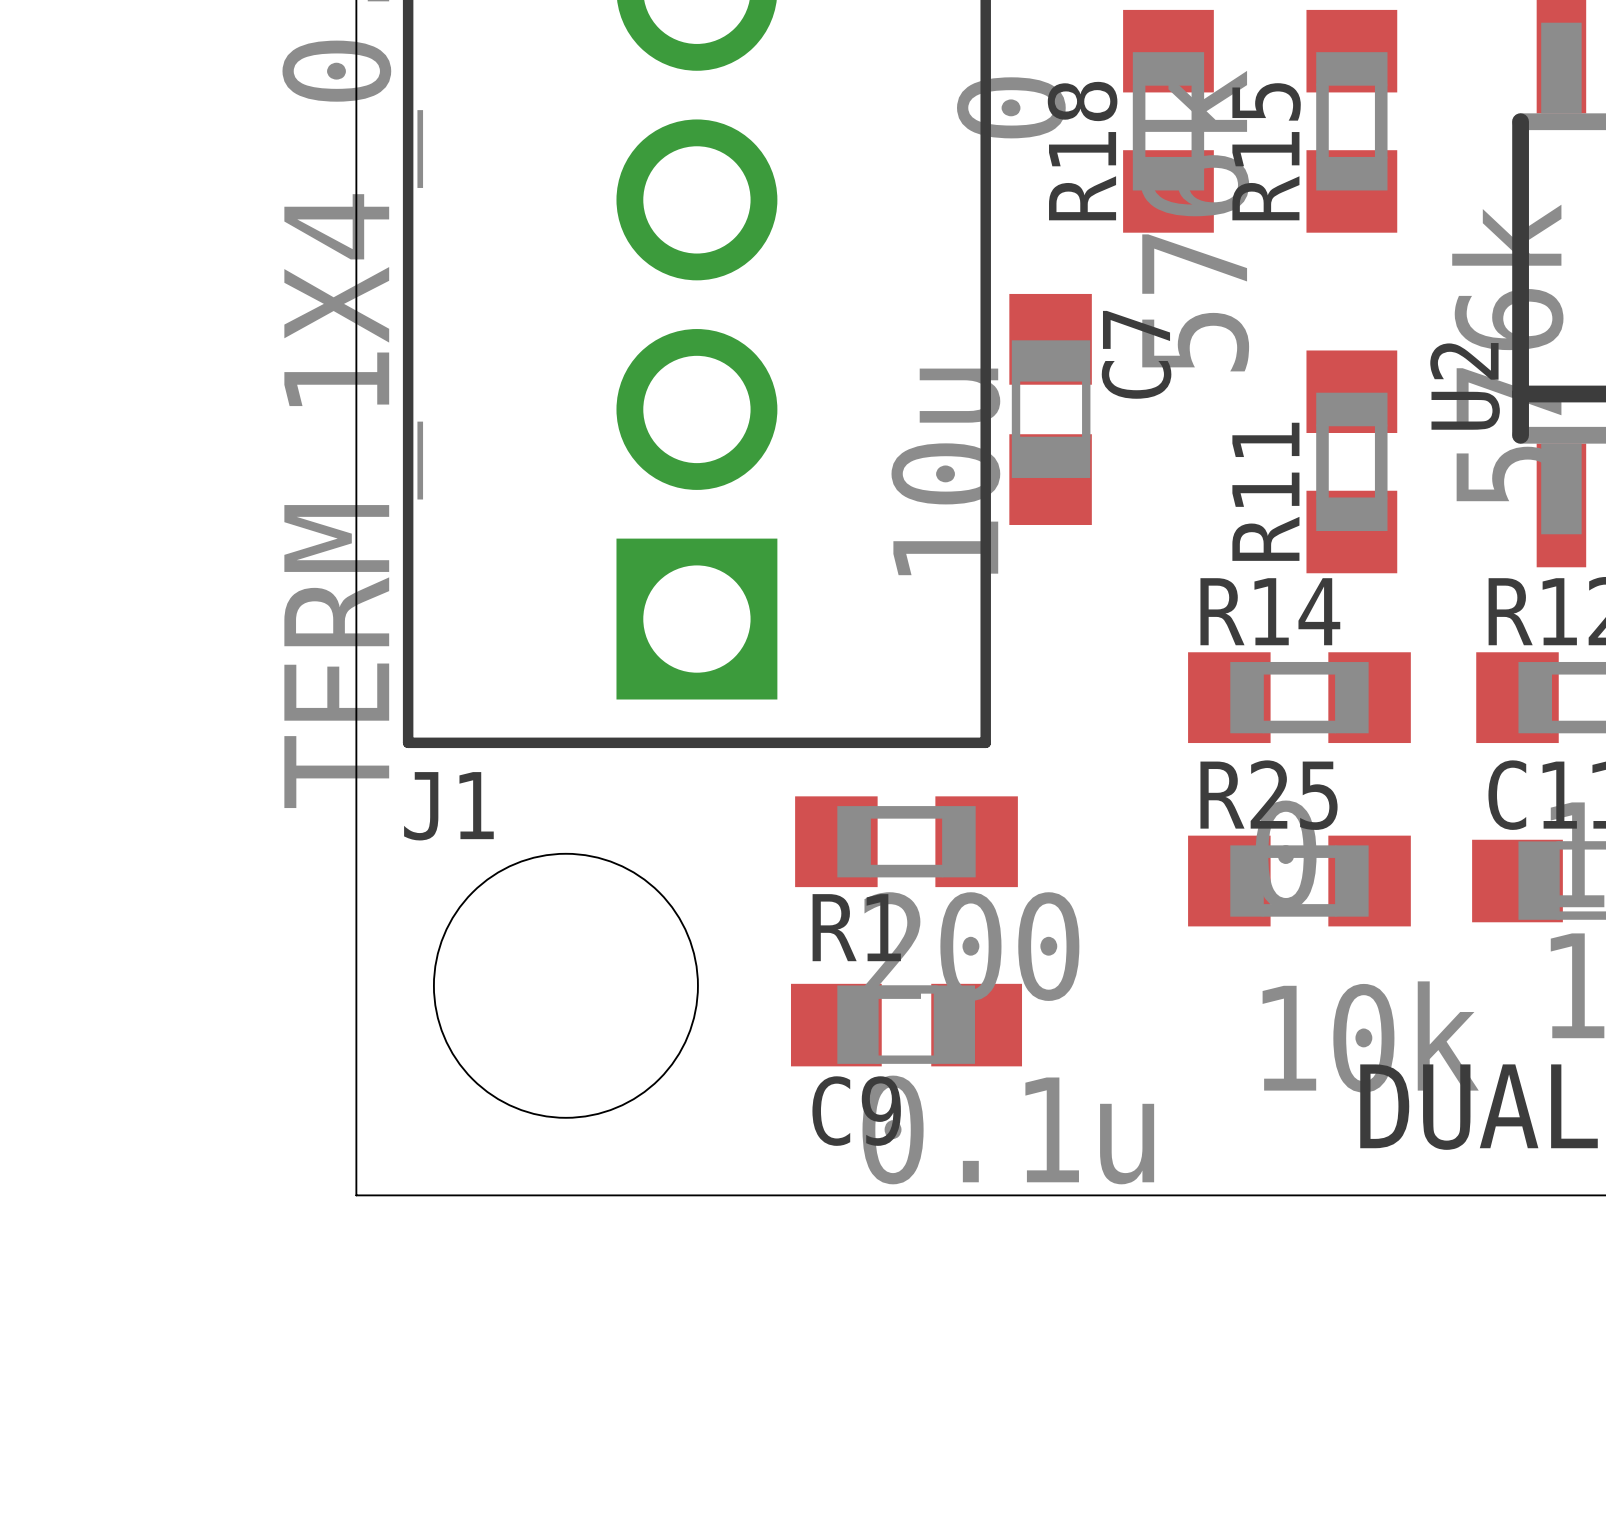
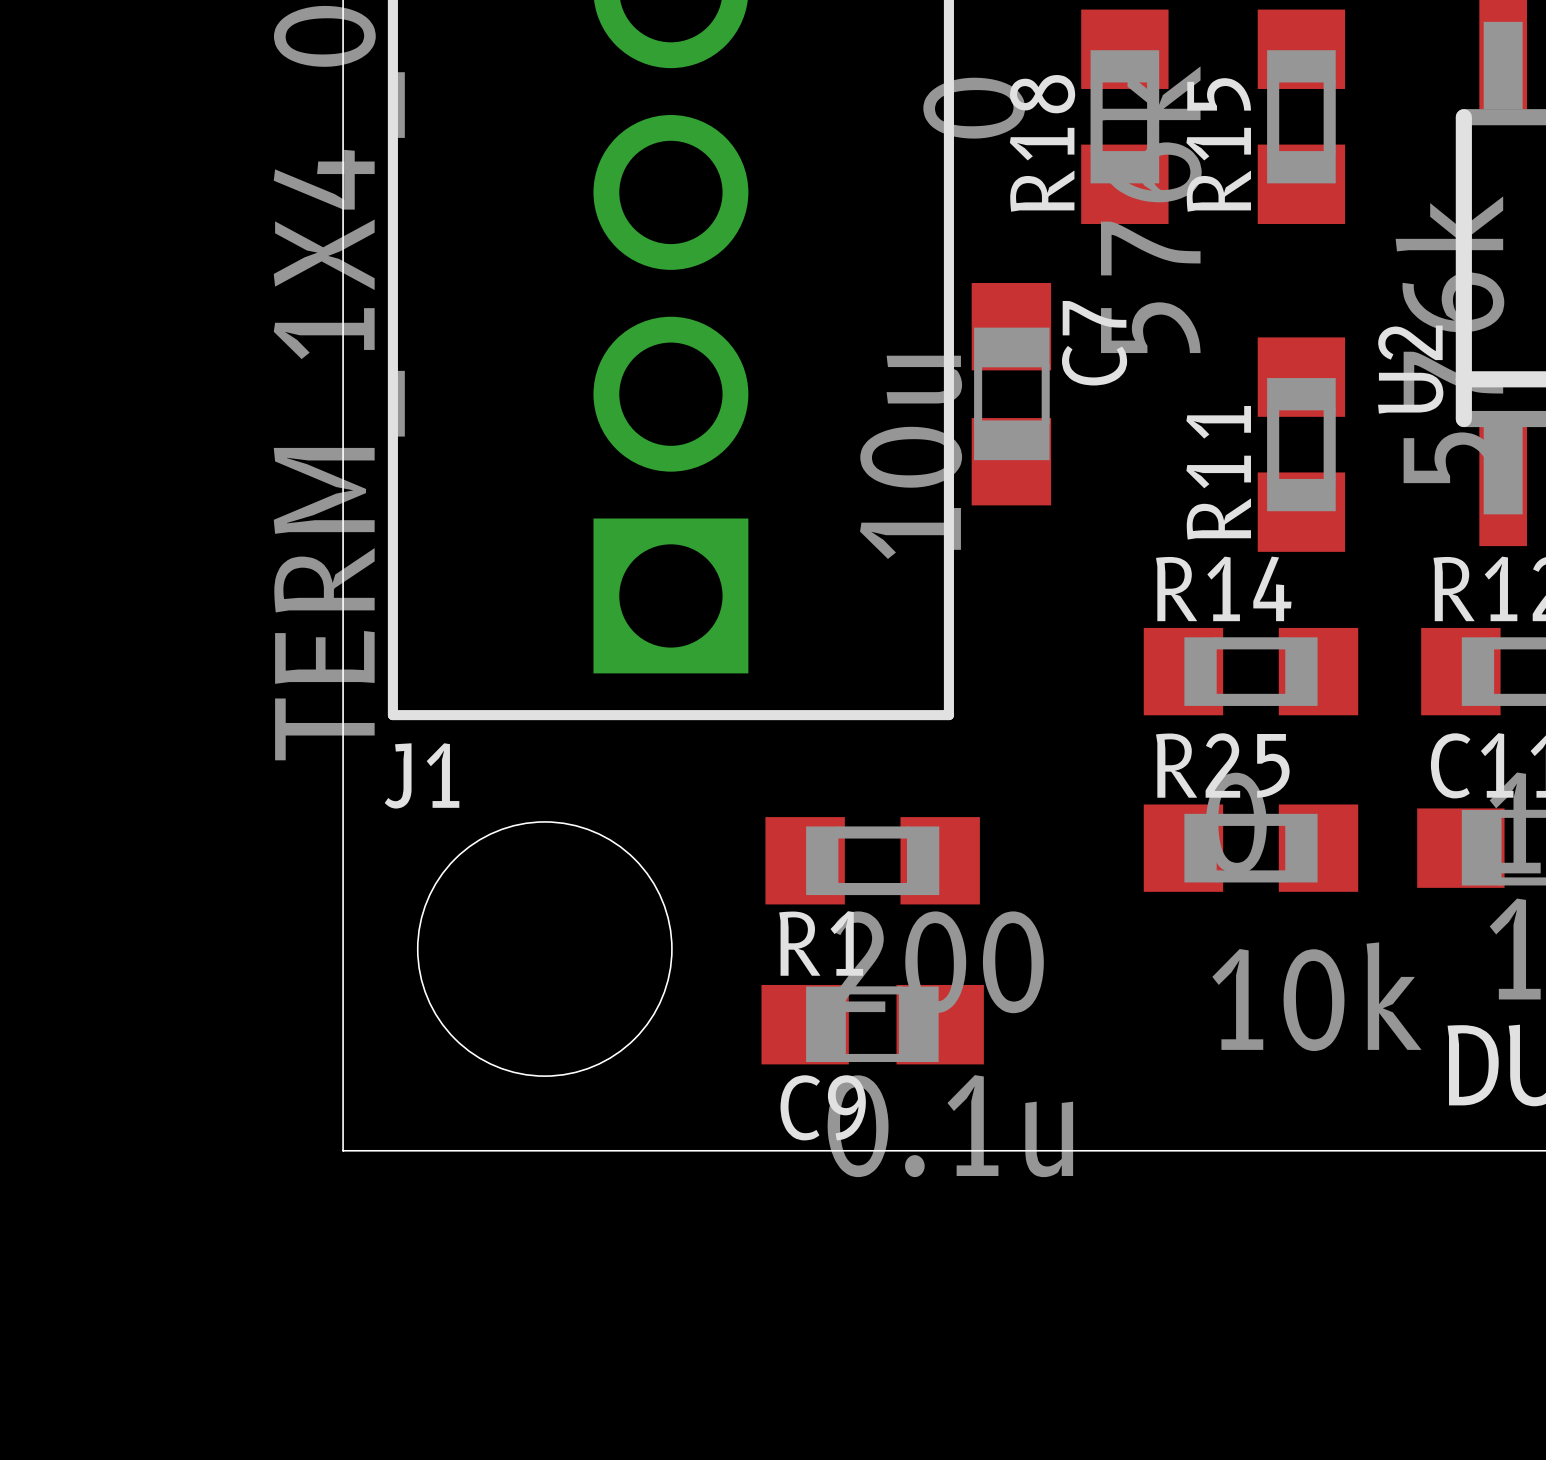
R1 position: (906, 841) -> (872, 860)
C9 position: (906, 1025) -> (872, 1024)

